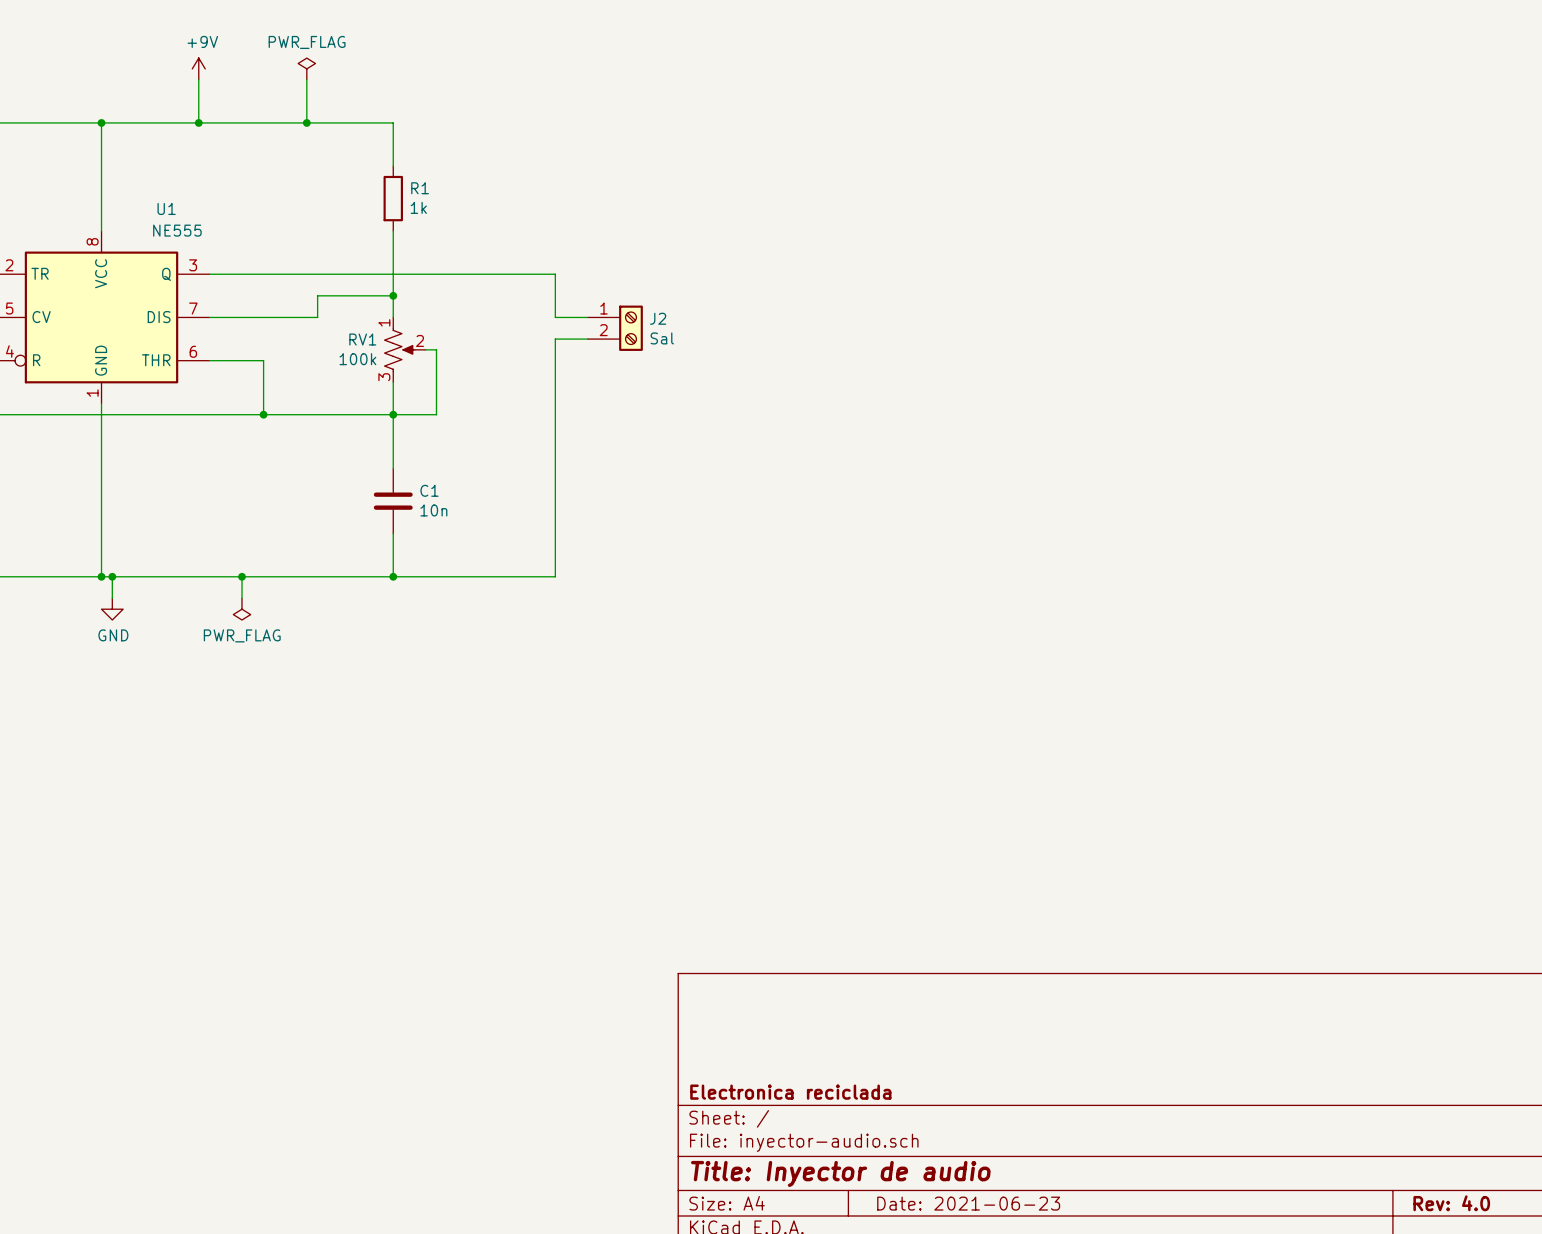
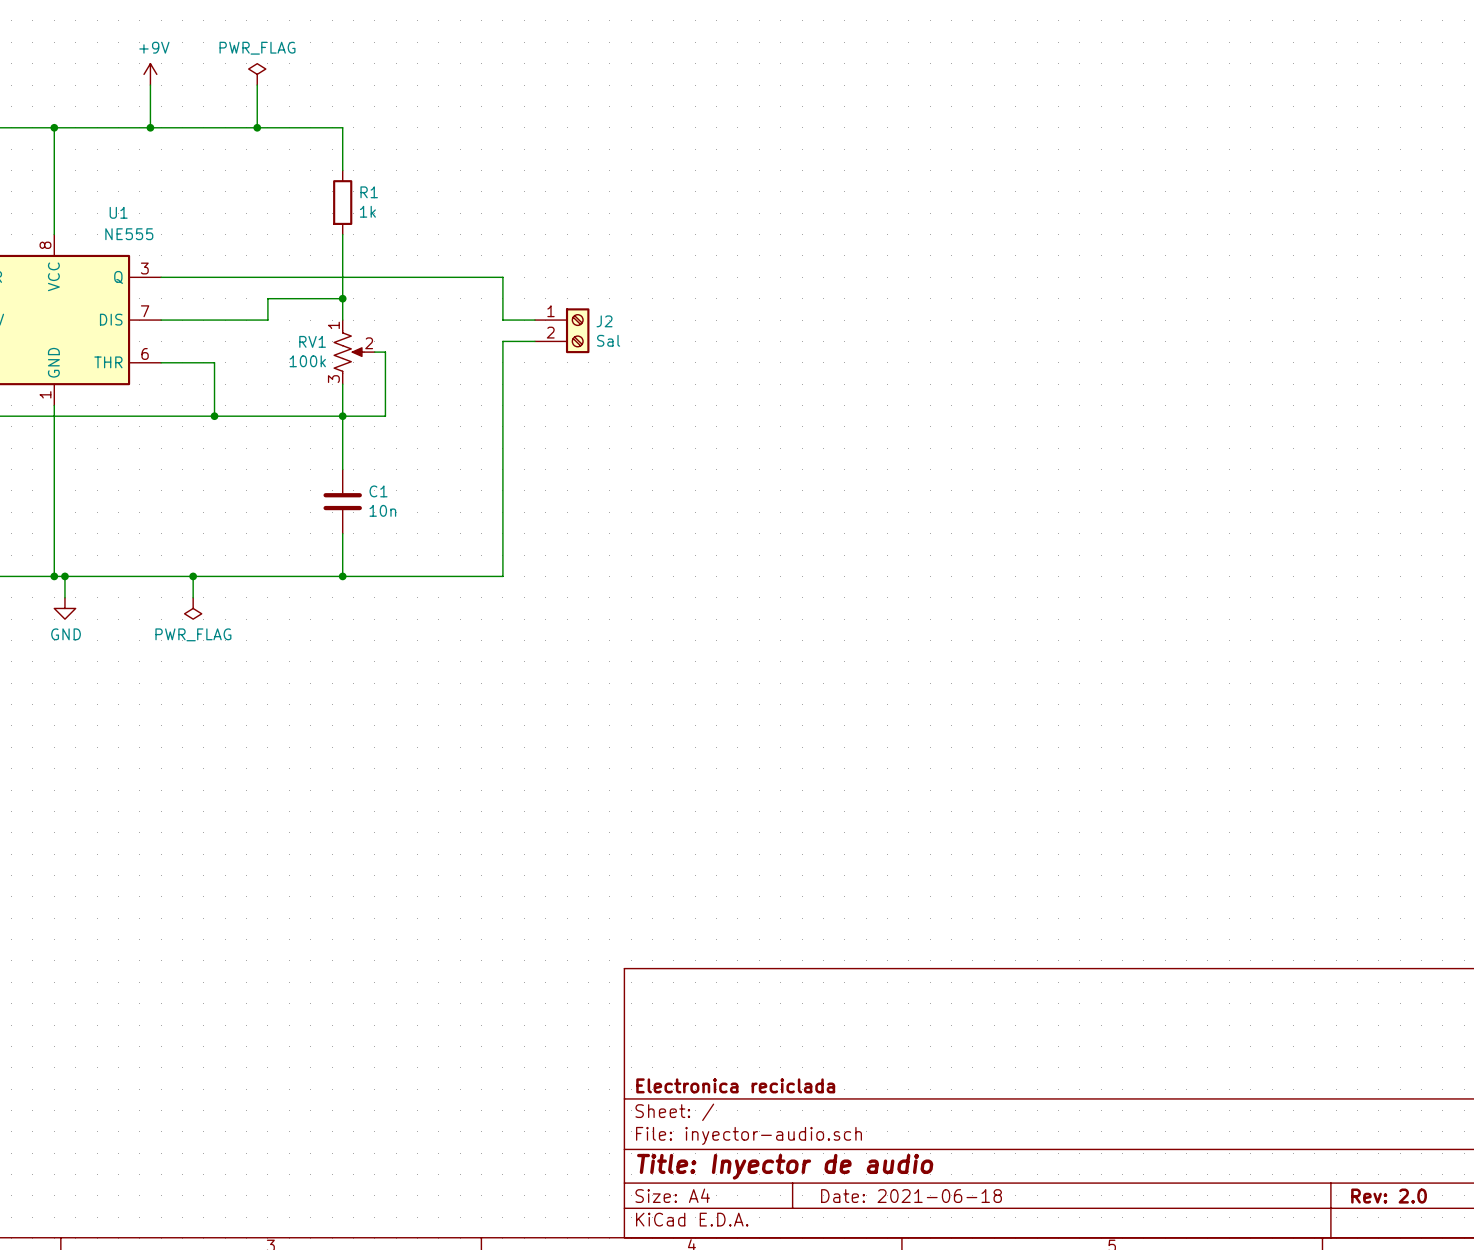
title block: Date: 2021-06-23 (968, 1203) -> Date: 2021-06-18 (911, 1196)
title block: Rev: 4.0 (1451, 1203) -> Rev: 2.0 (1389, 1196)

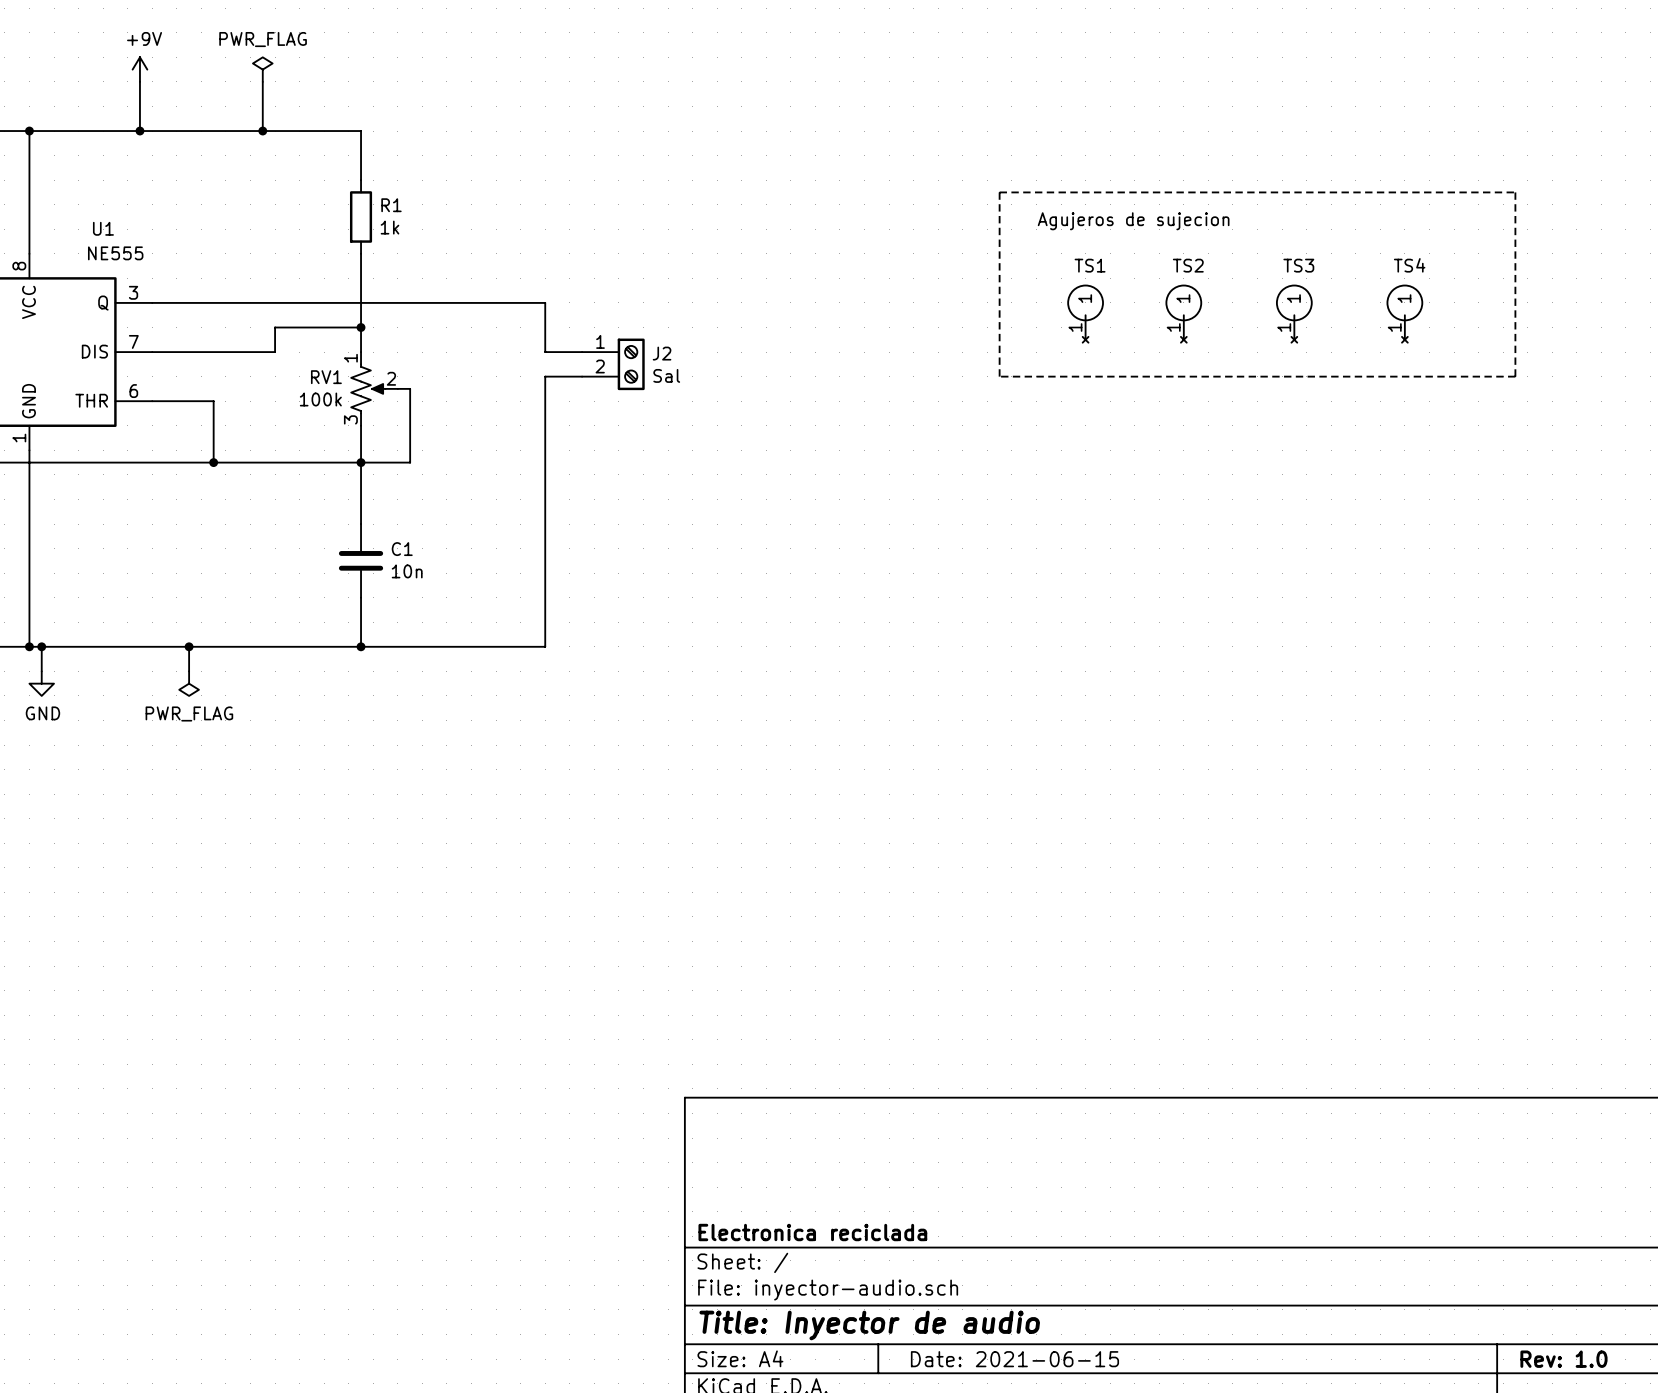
line: none -> (999, 192) (1515, 192) (1515, 376) (999, 376) (999, 192)
text: none -> Agujeros de sujecion (1133, 221)
TS1: none -> (1085, 314)
TS2: none -> (1183, 314)
TS3: none -> (1294, 314)
TS4: none -> (1404, 314)
title block: Date: 2021-06-18 (911, 1196) -> Date: 2021-06-15 (1014, 1359)
title block: Rev: 2.0 (1389, 1196) -> Rev: 1.0 (1563, 1359)

